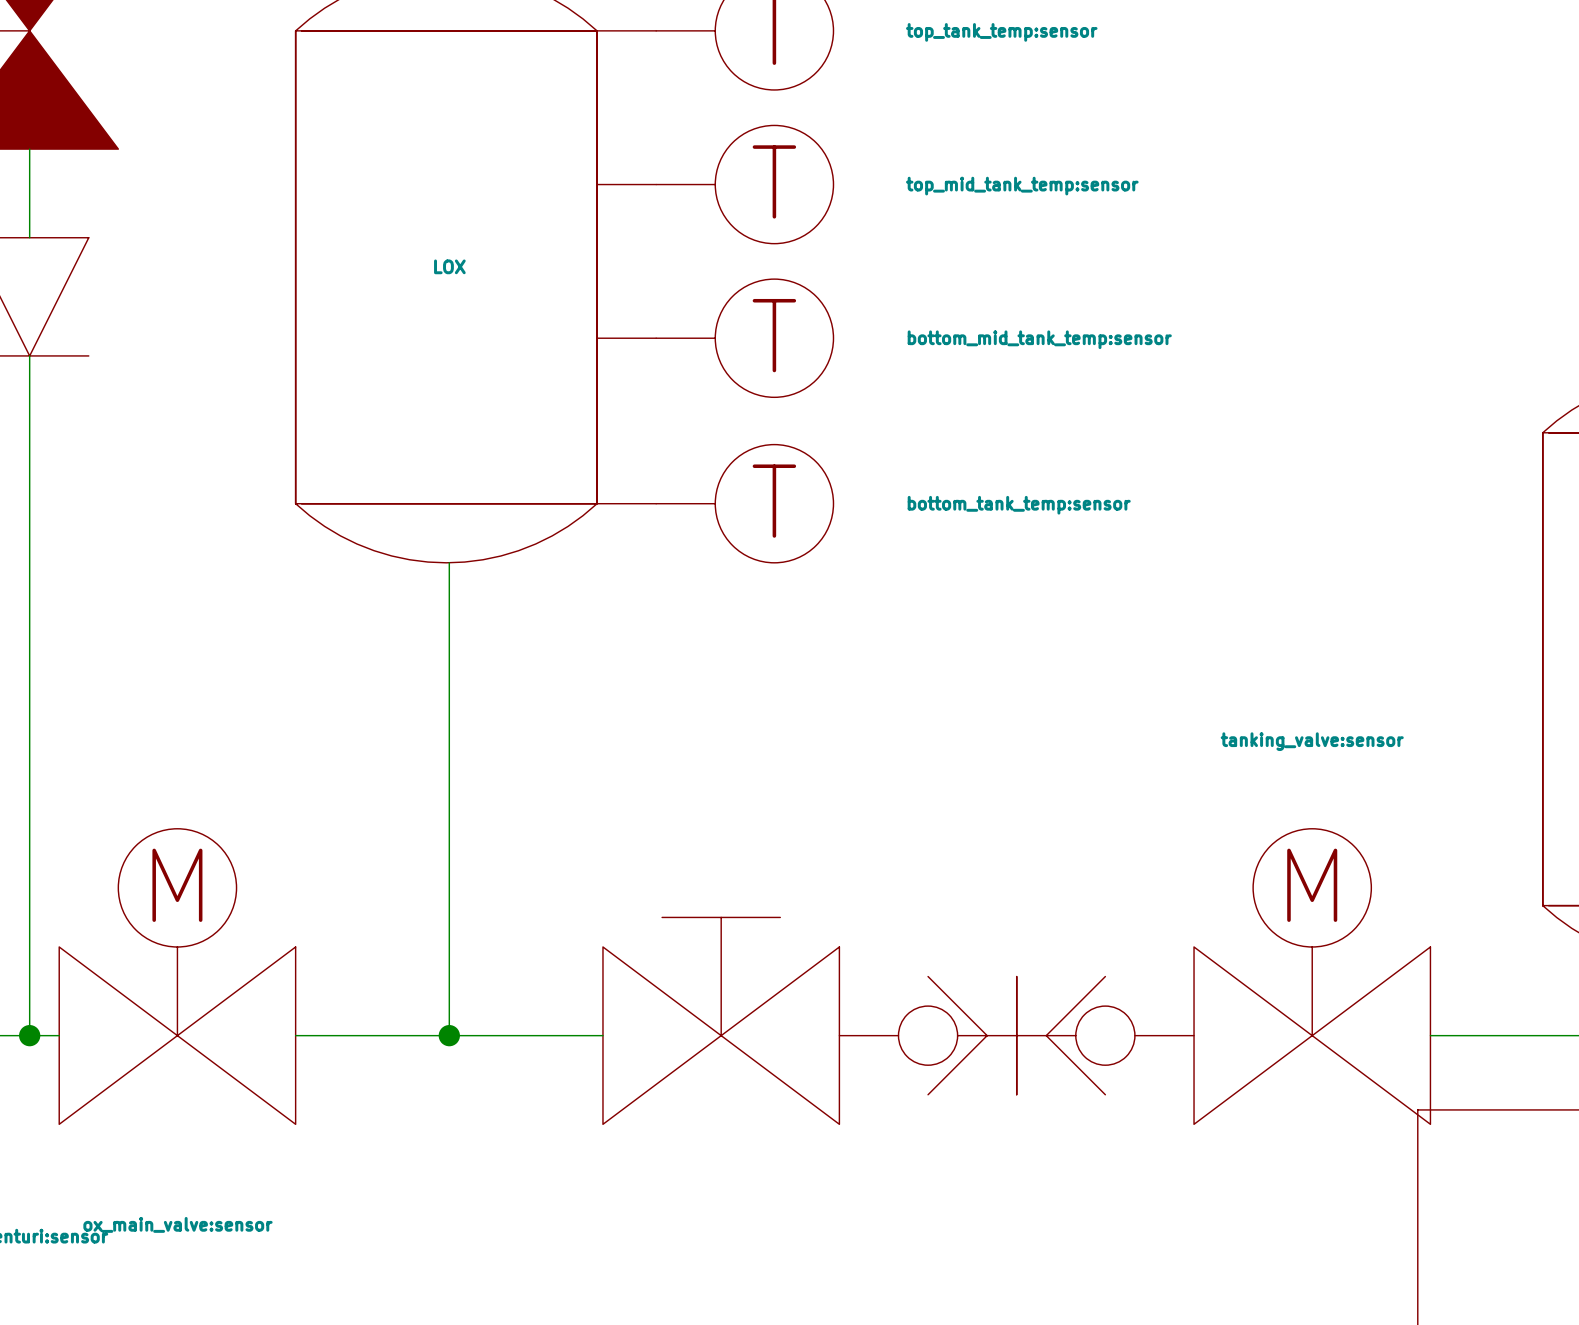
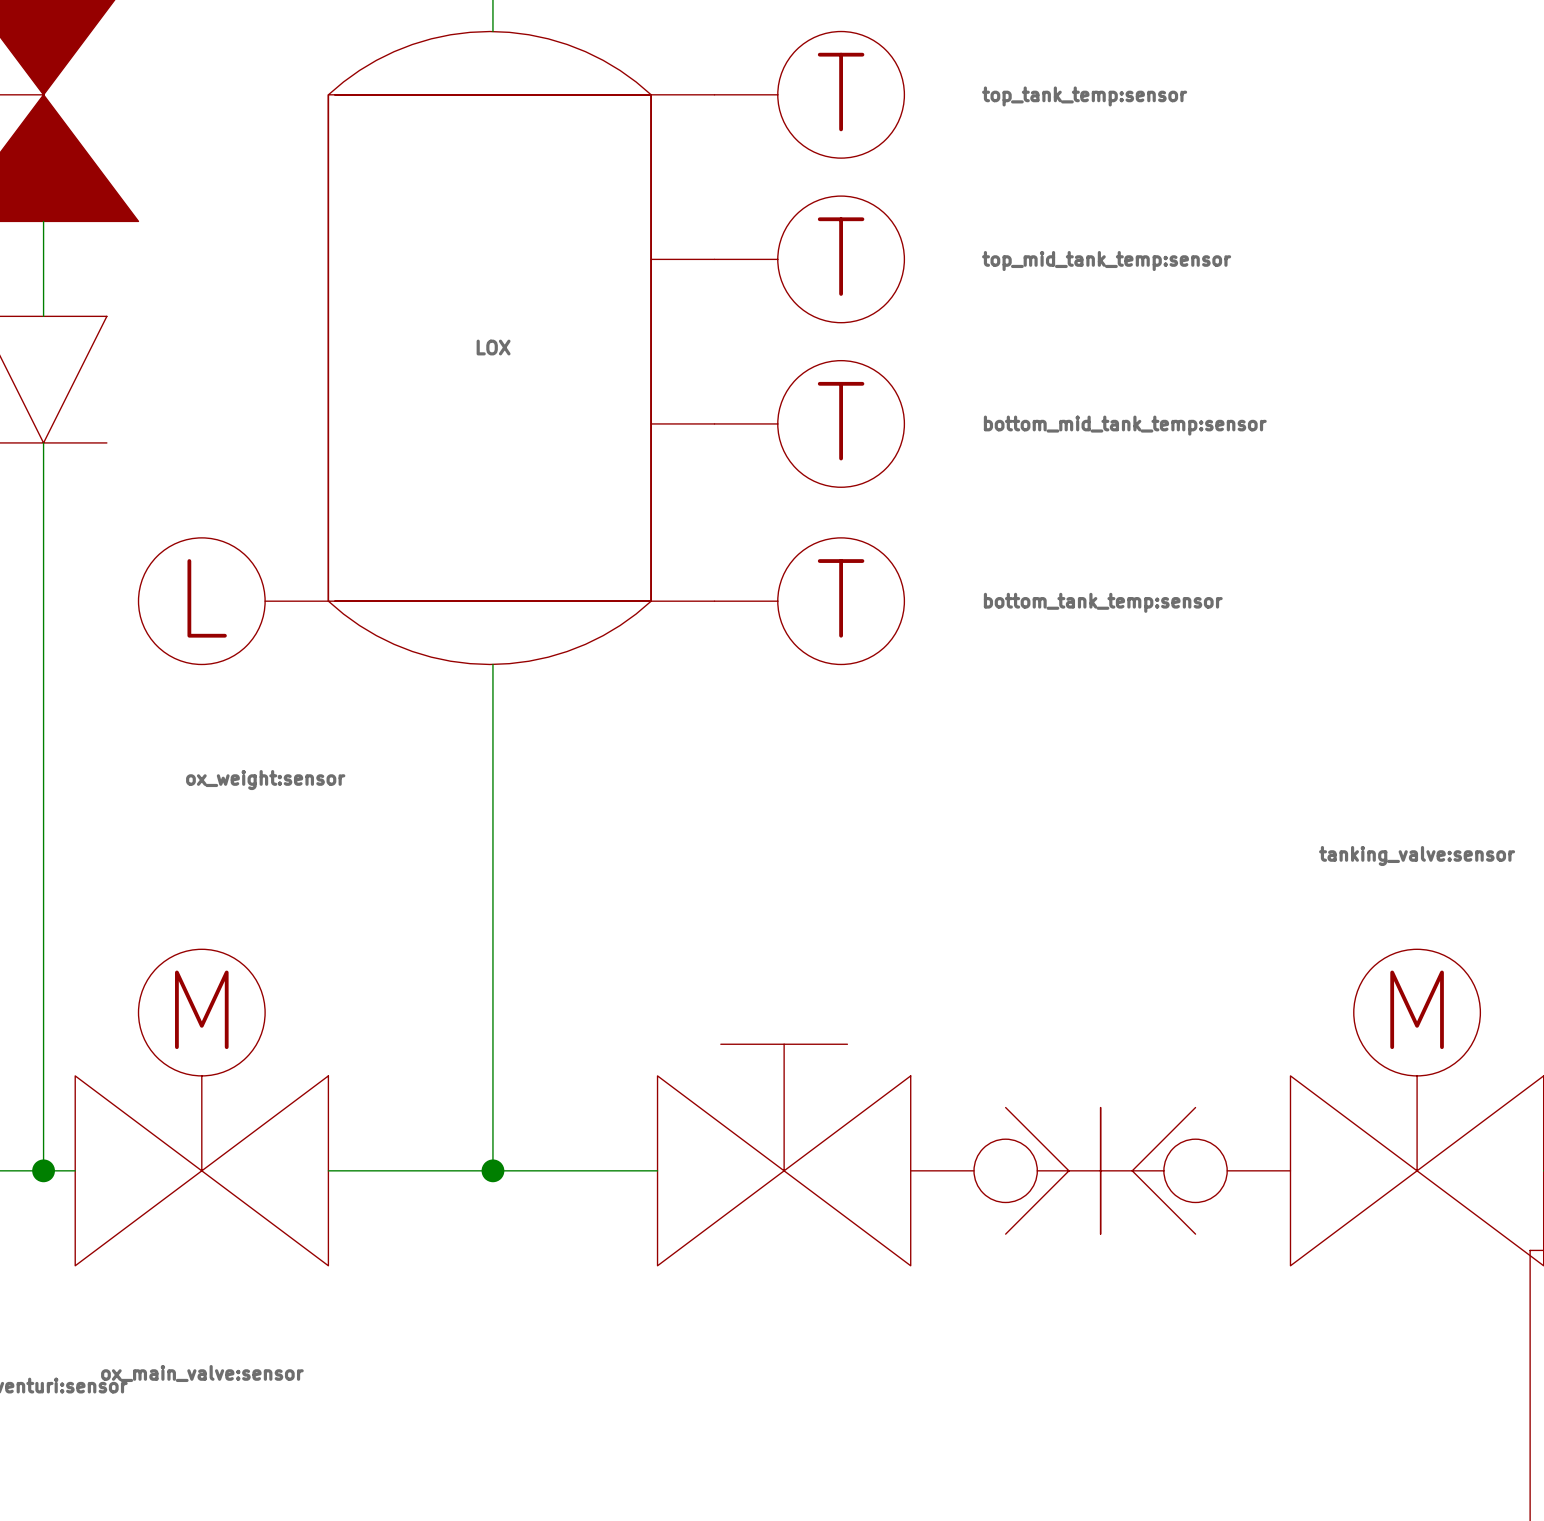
part: none -> ox_weight:sensor (233, 601)

